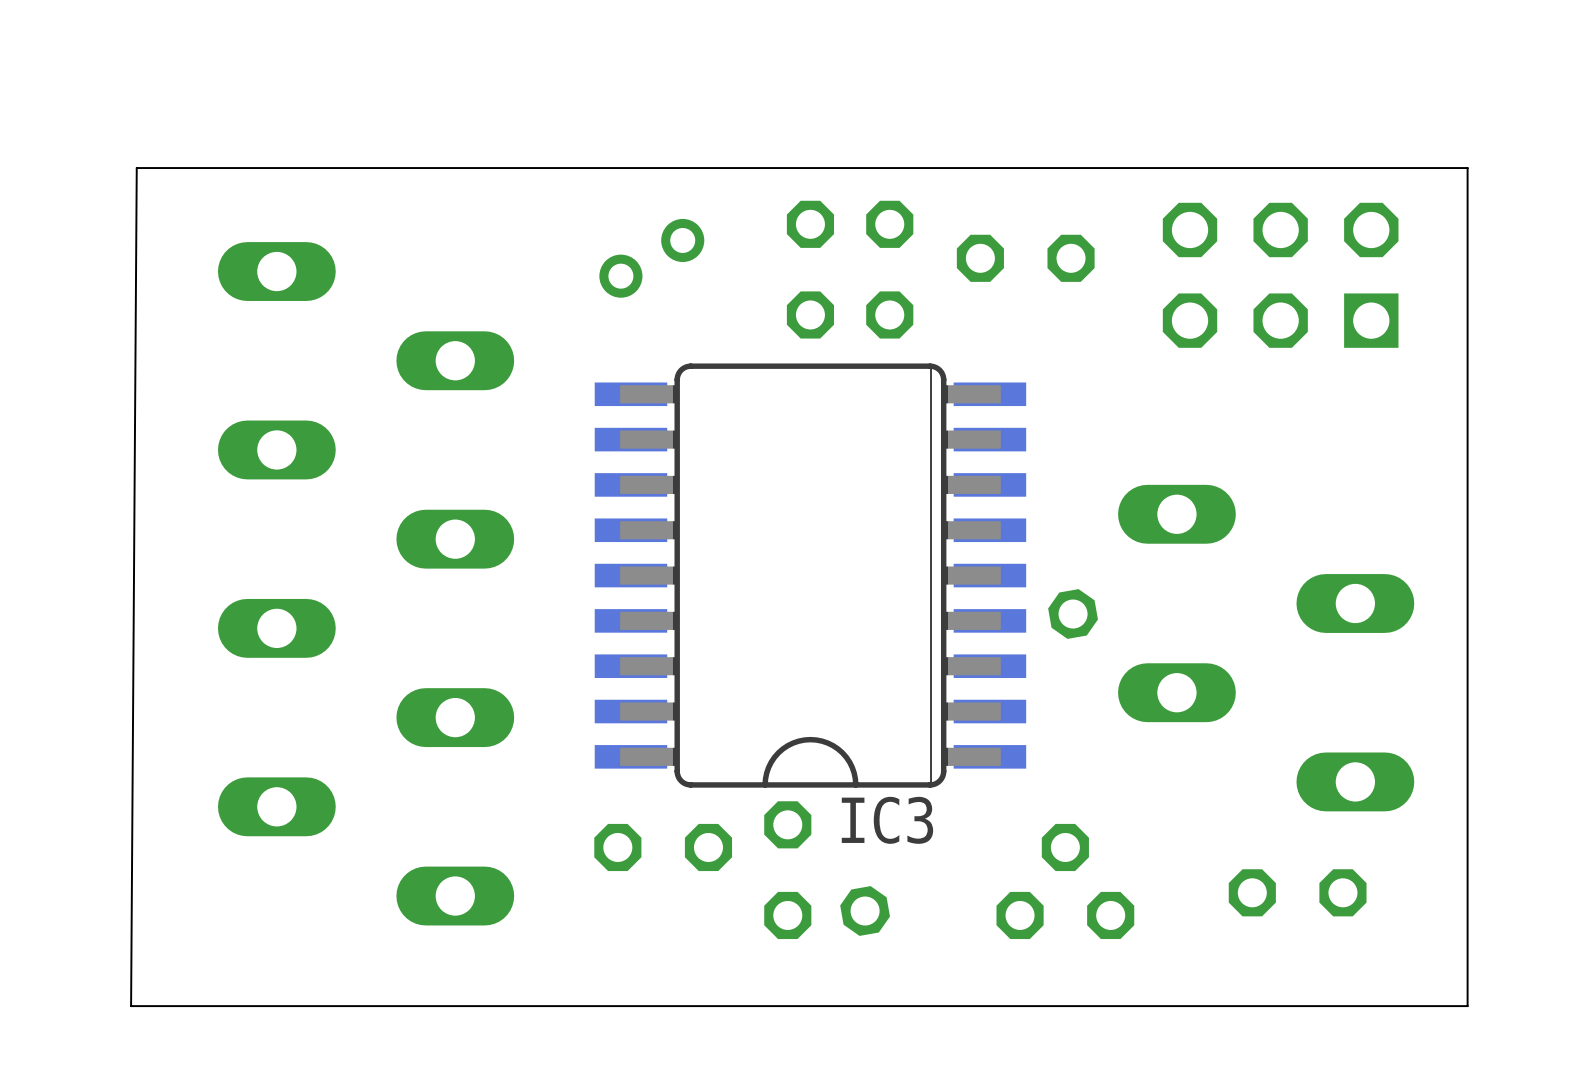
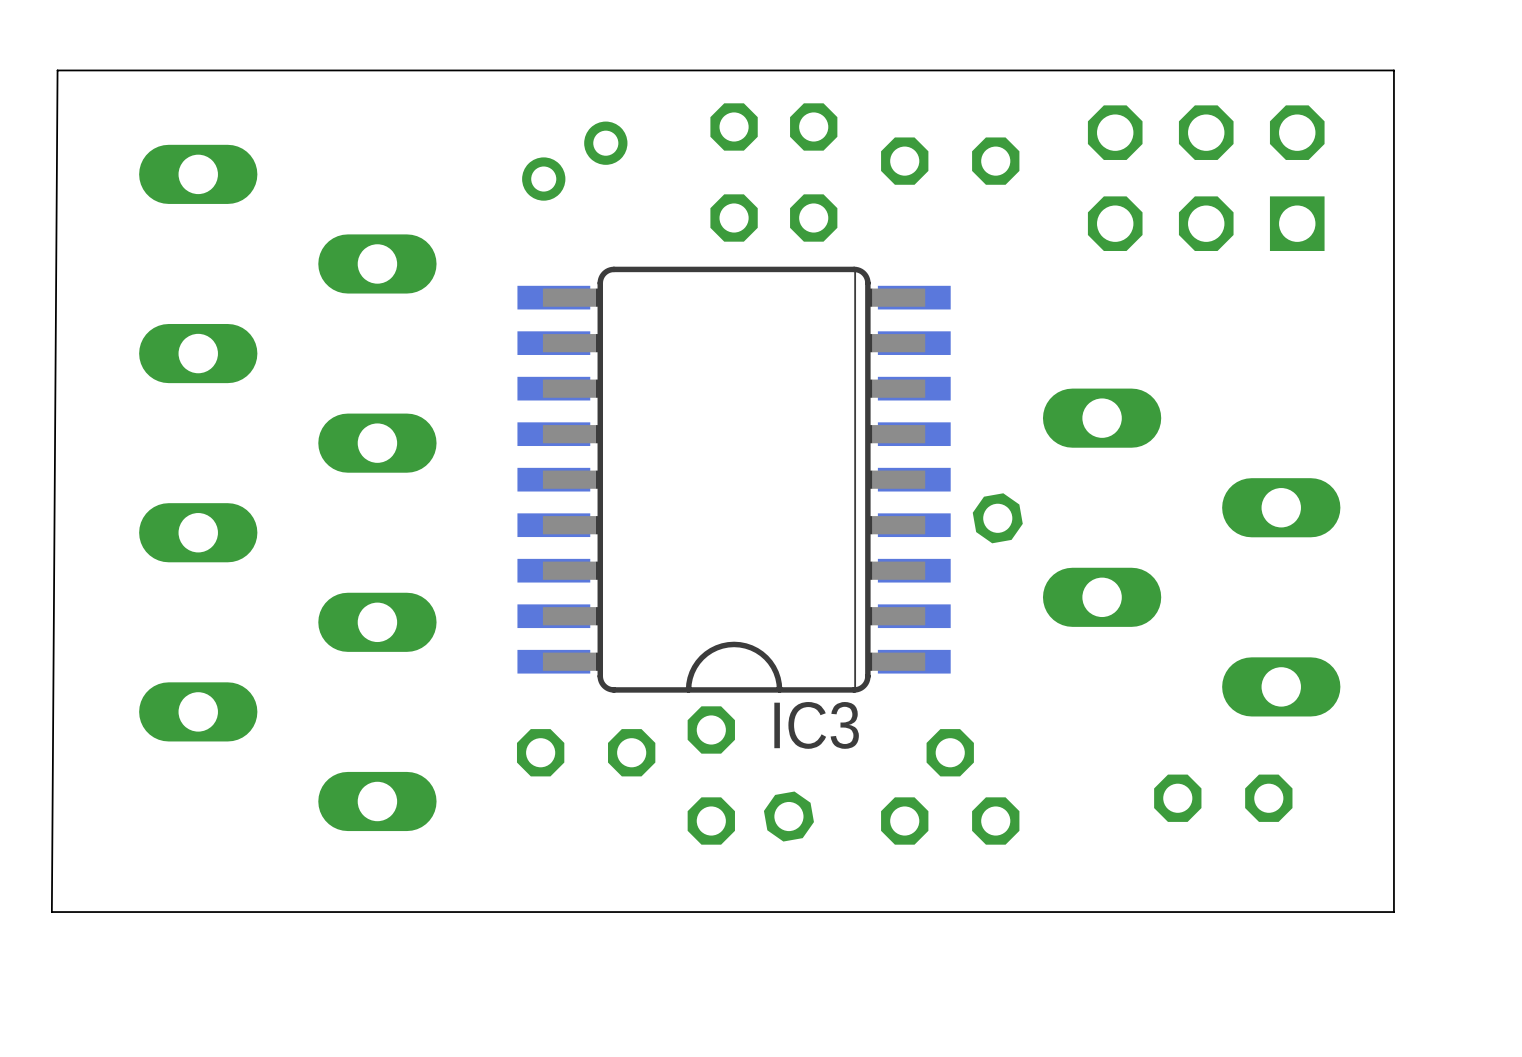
part position: (1065, 881) -> (950, 786)

